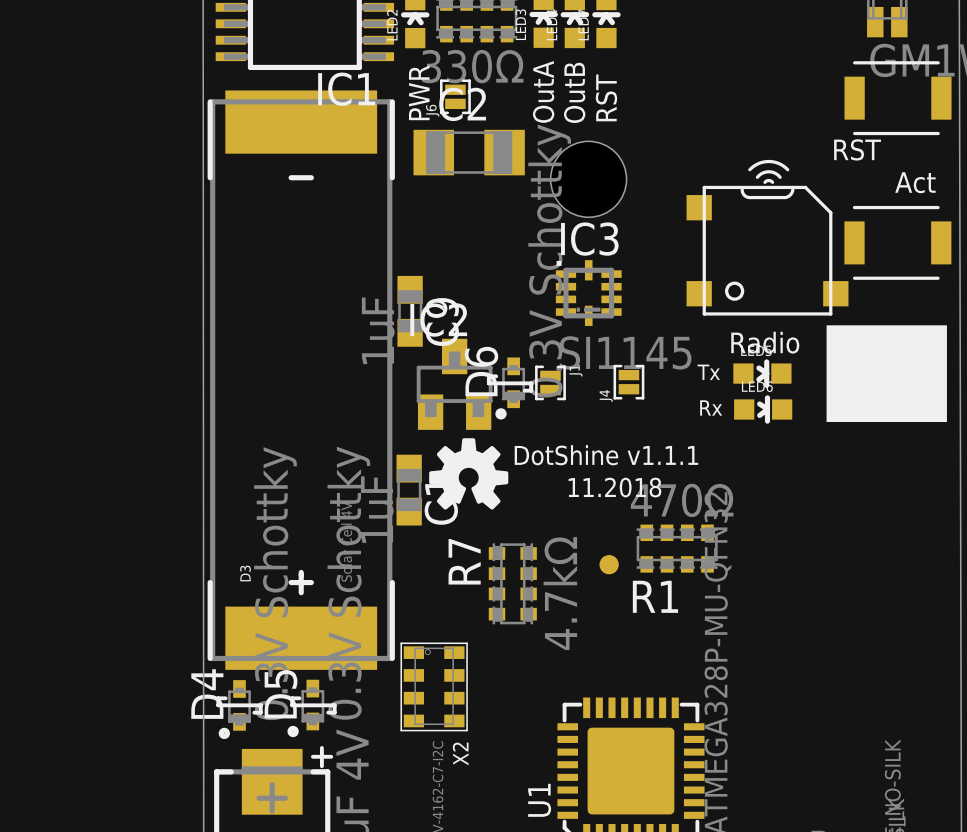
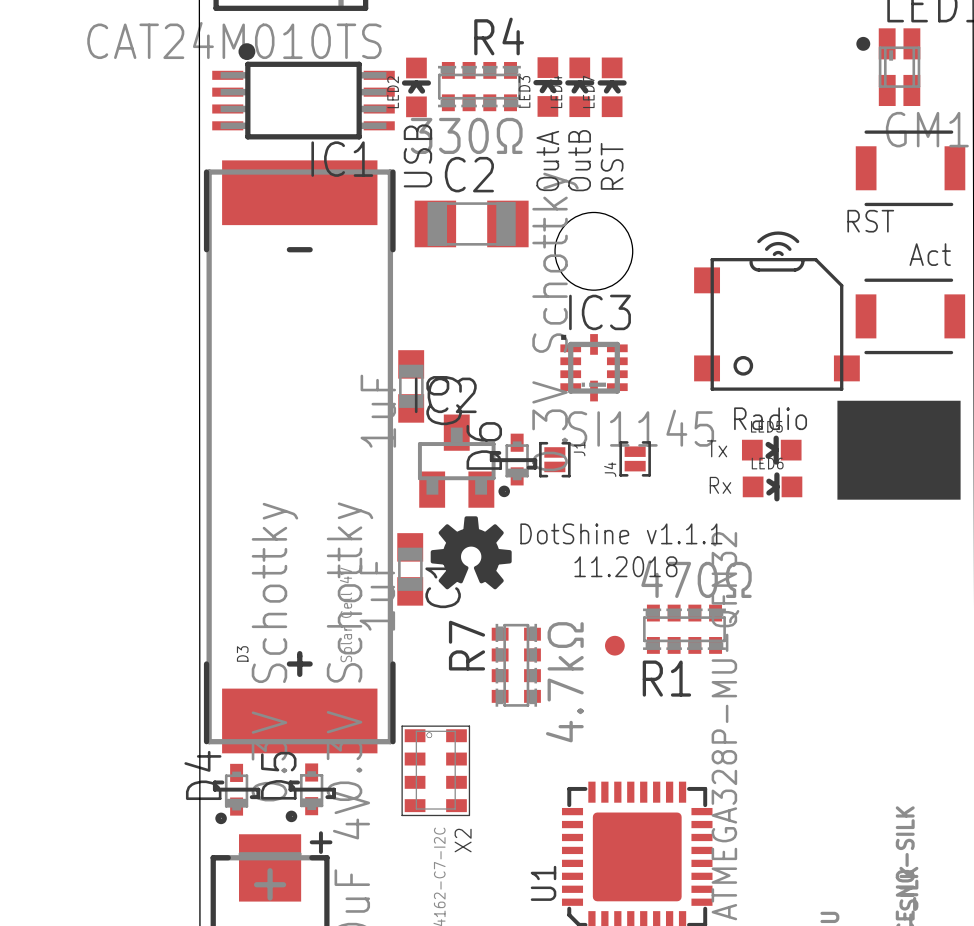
text: PWR (419, 92) -> USB (417, 155)
J6: (455, 96) -> none

